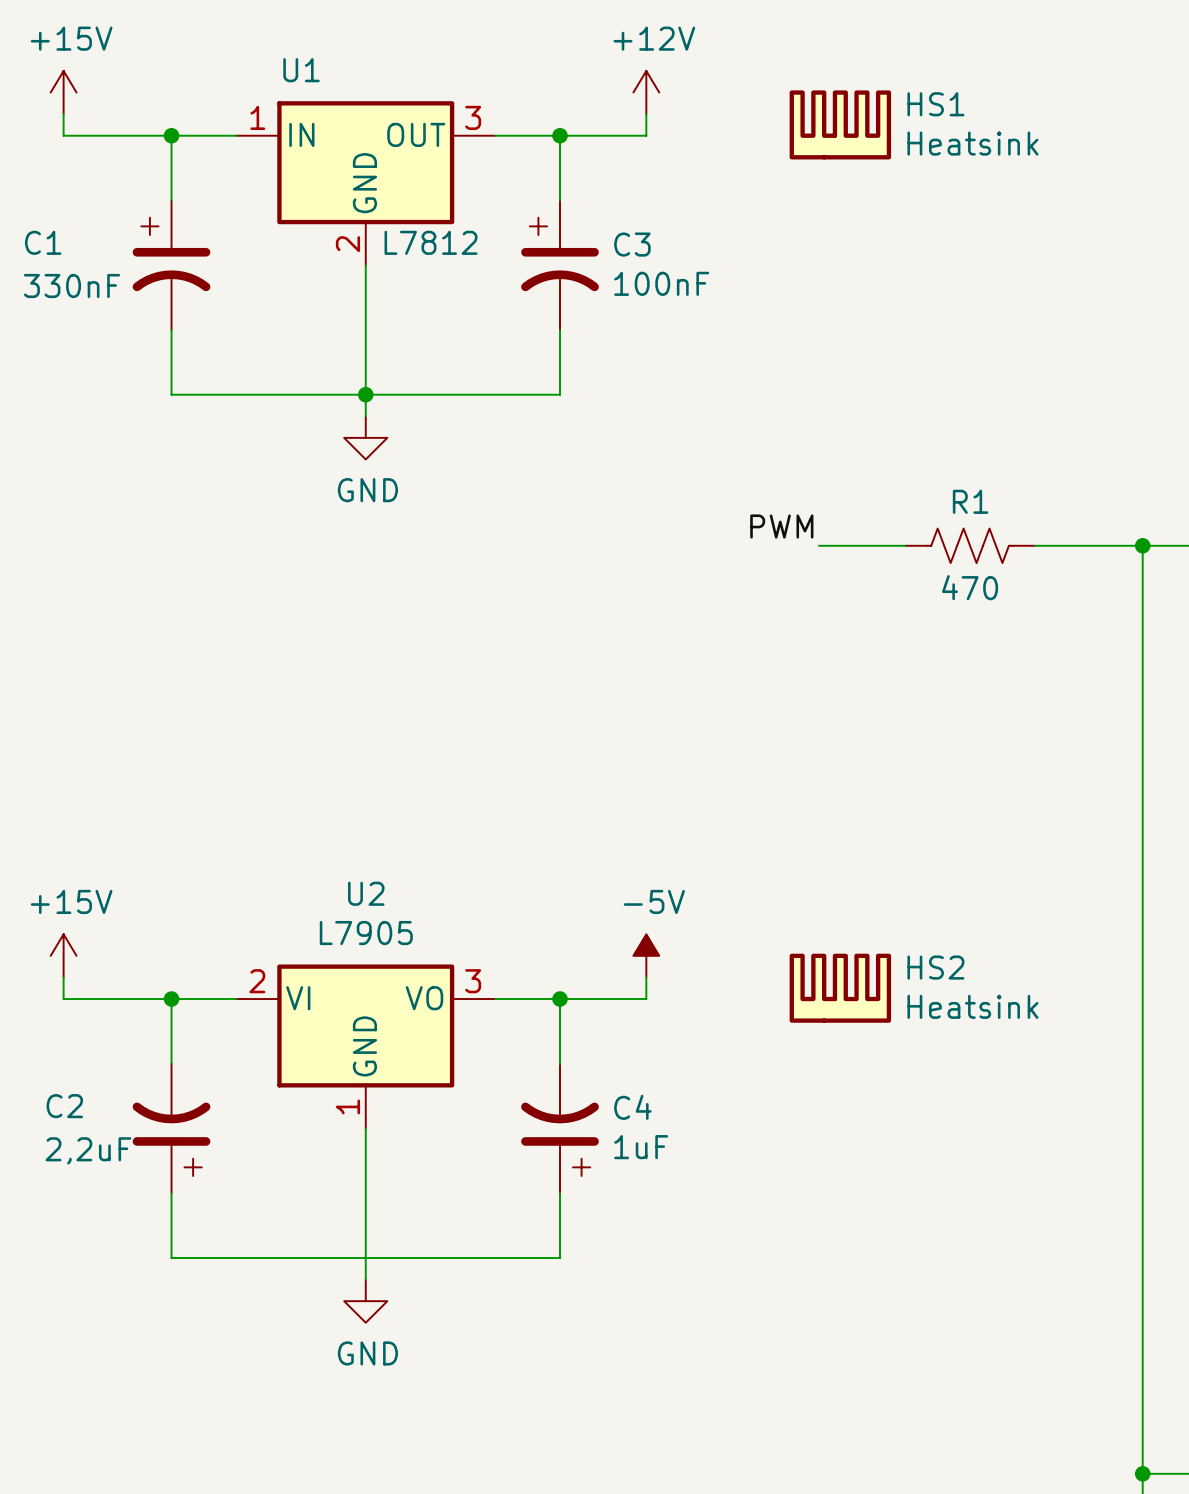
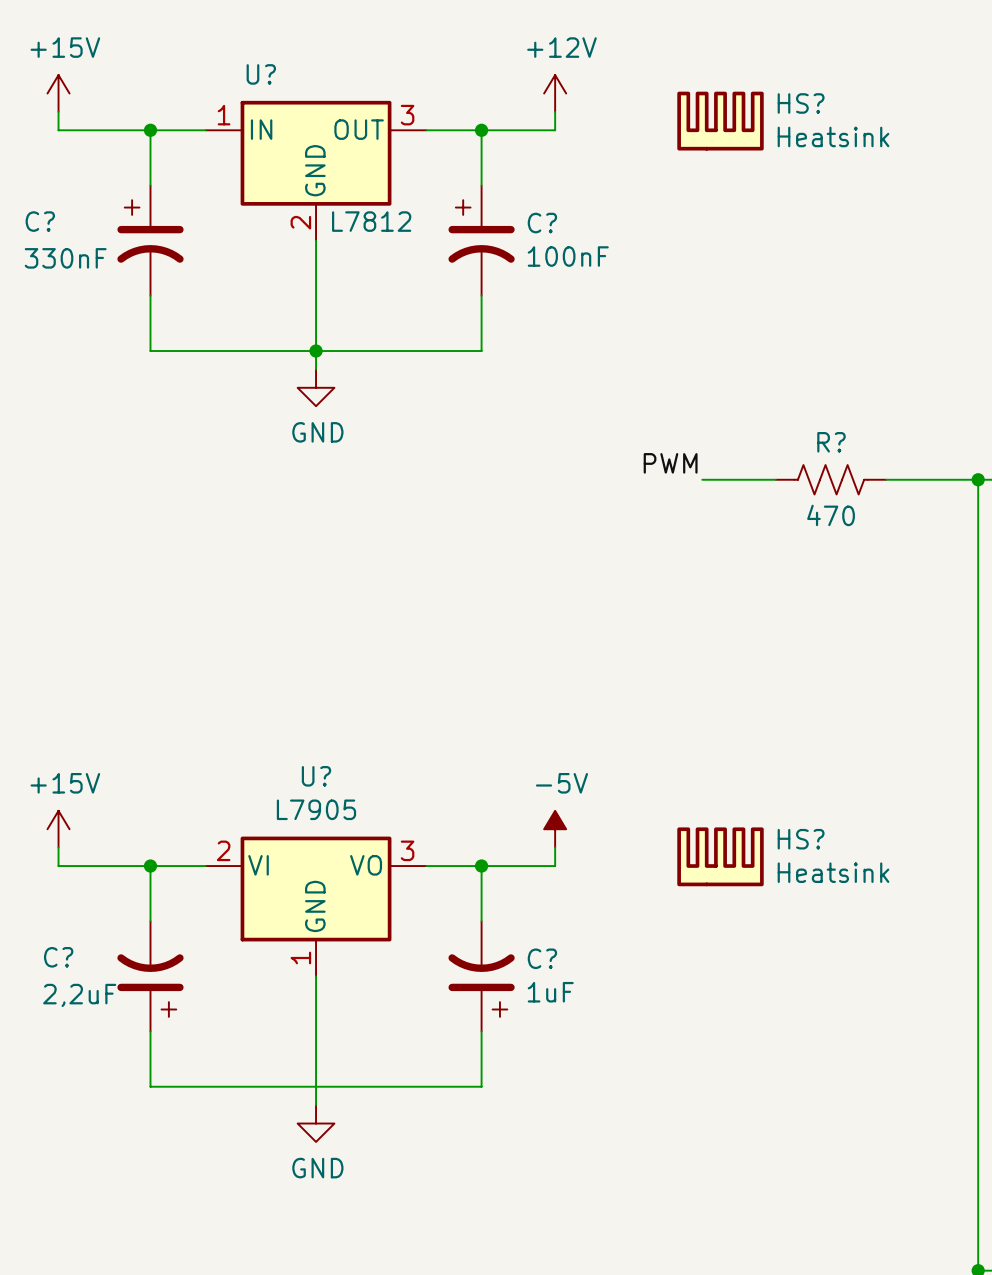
U1 name: U1 (301, 70) -> U? (261, 74)
HS1 name: HS1 (935, 104) -> HS? (801, 103)
C1 name: C1 (43, 242) -> C? (40, 221)
C3 name: C3 (632, 244) -> C? (542, 223)
R1 name: R1 (970, 501) -> R? (831, 442)
U2 name: U2 (366, 893) -> U? (316, 776)
HS2 name: HS2 (935, 967) -> HS? (801, 839)
C2 name: C2 (64, 1106) -> C? (58, 957)
C4 name: C4 (632, 1107) -> C? (542, 958)

